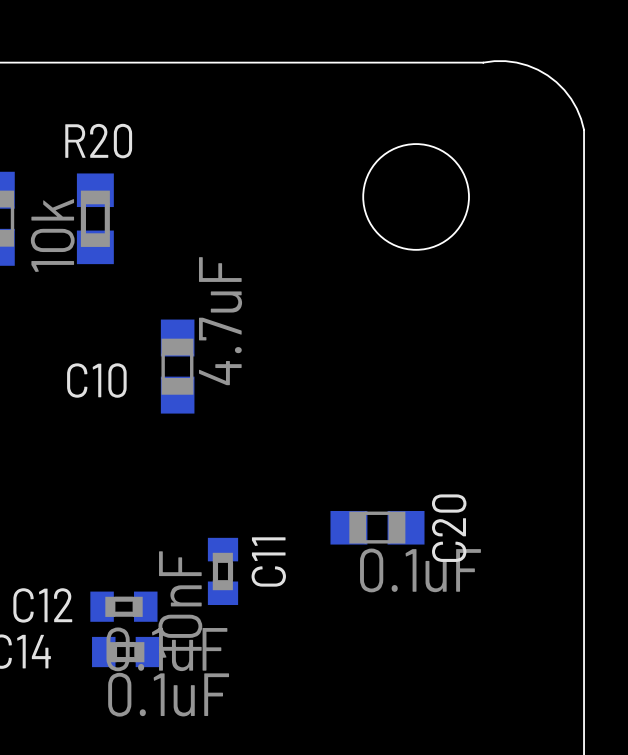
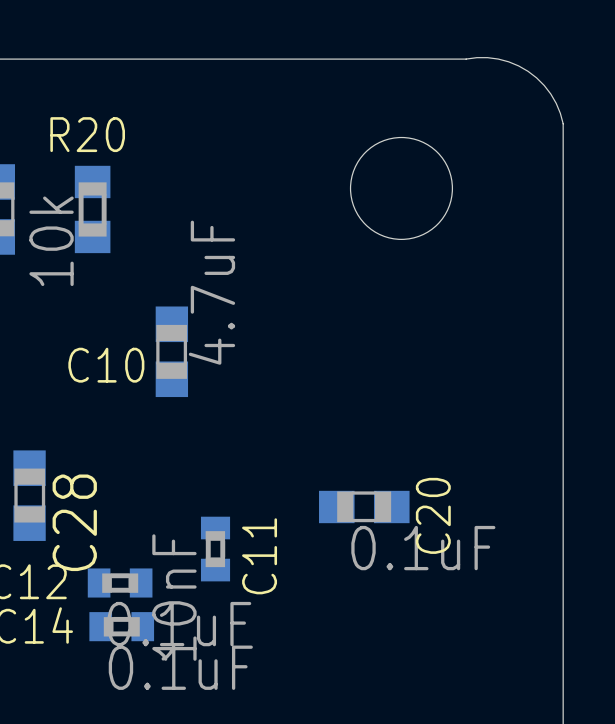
C28: none -> (29, 495)

